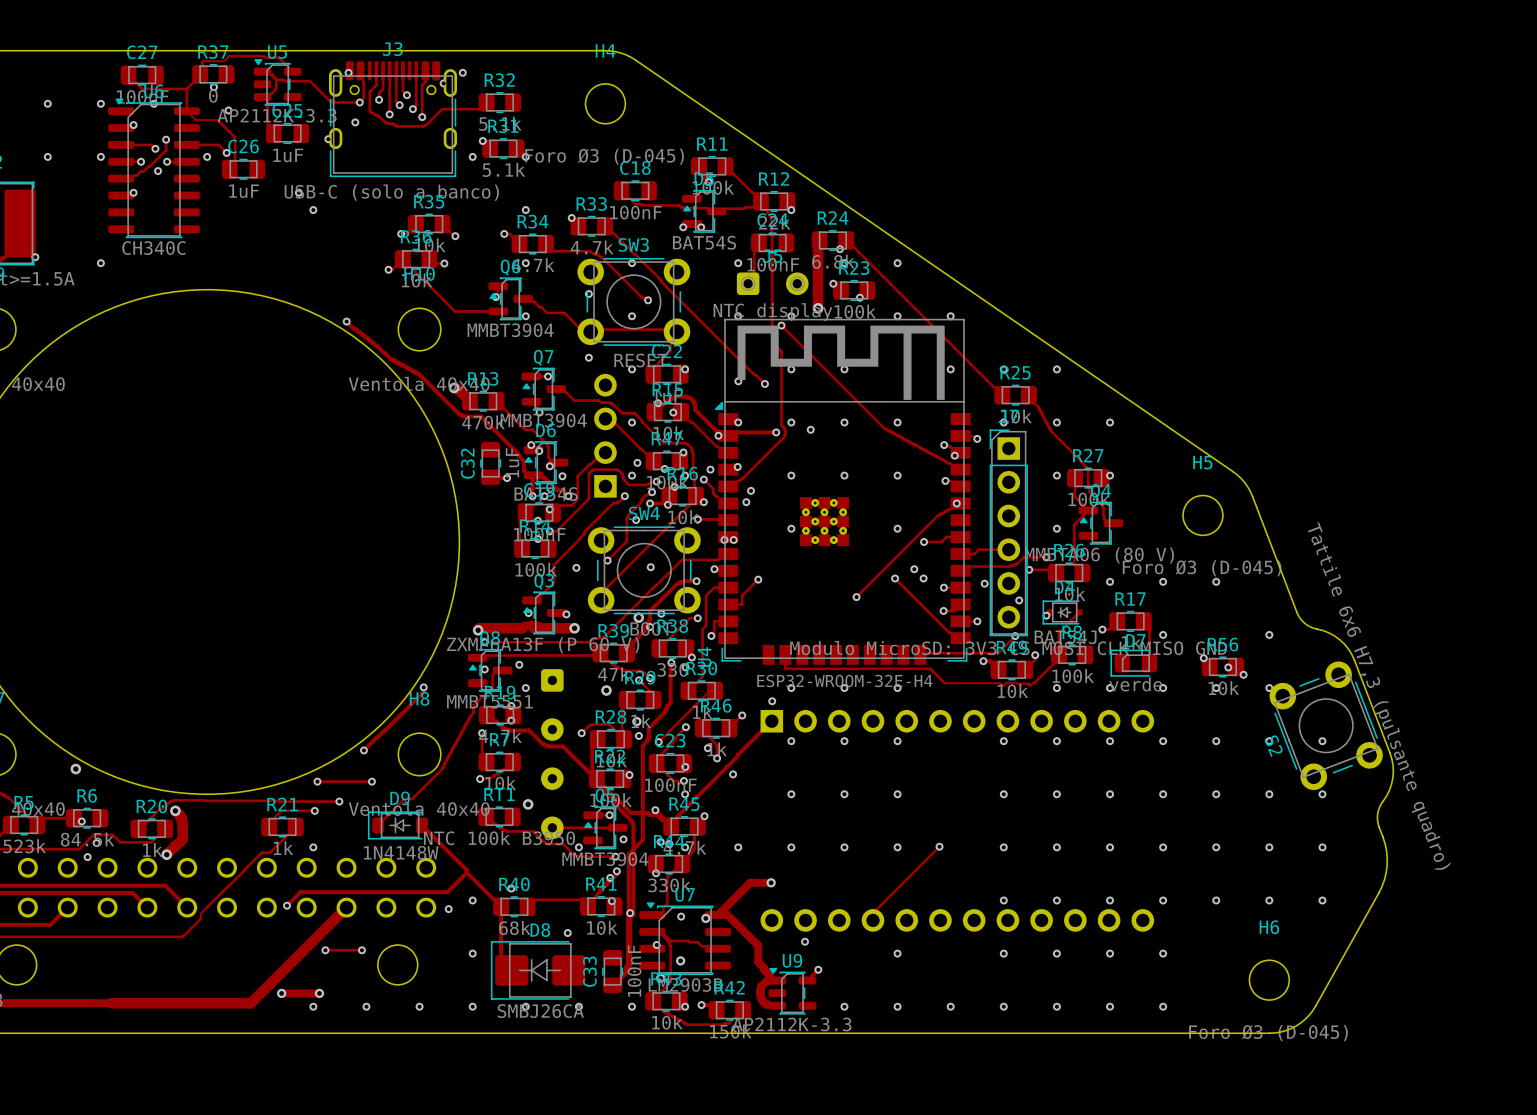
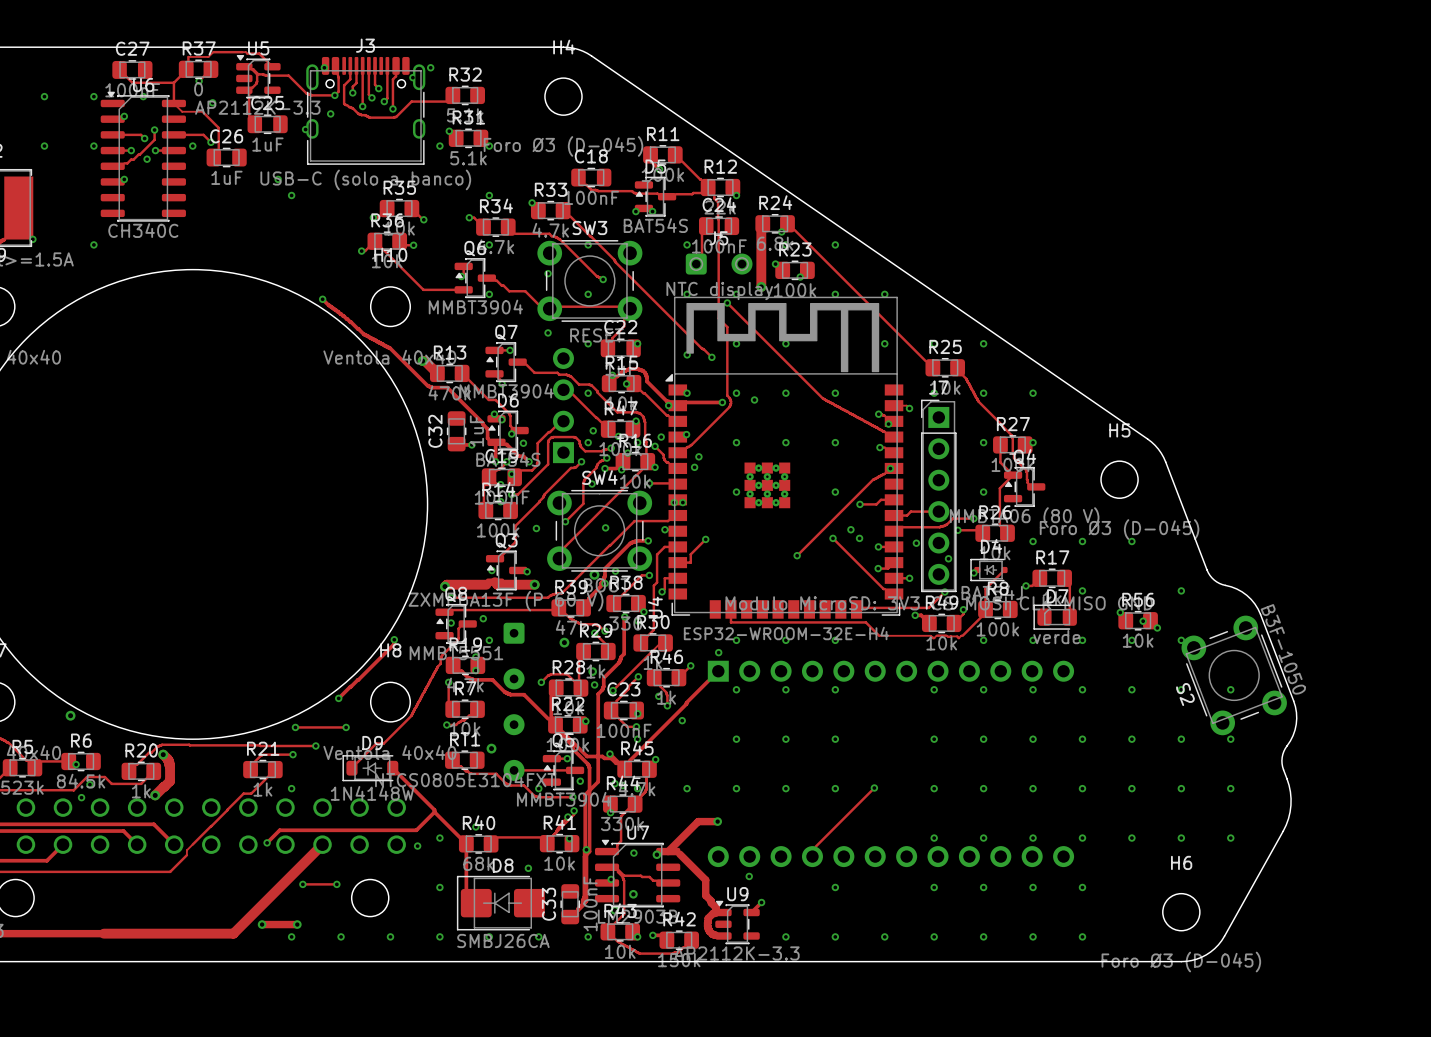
S2 value: Tattile 6x6 H7,3 (pulsante quadro) (1379, 696) -> B3F-1050 (1283, 649)
RT1 value: NTC 100k B3950 (499, 838) -> NTCS0805E3104FXT (465, 779)

